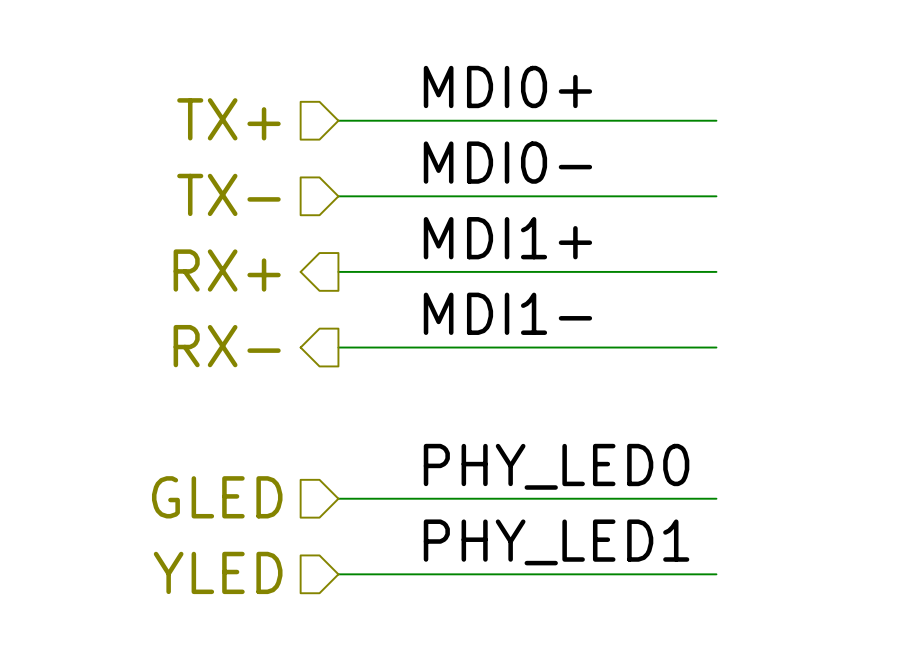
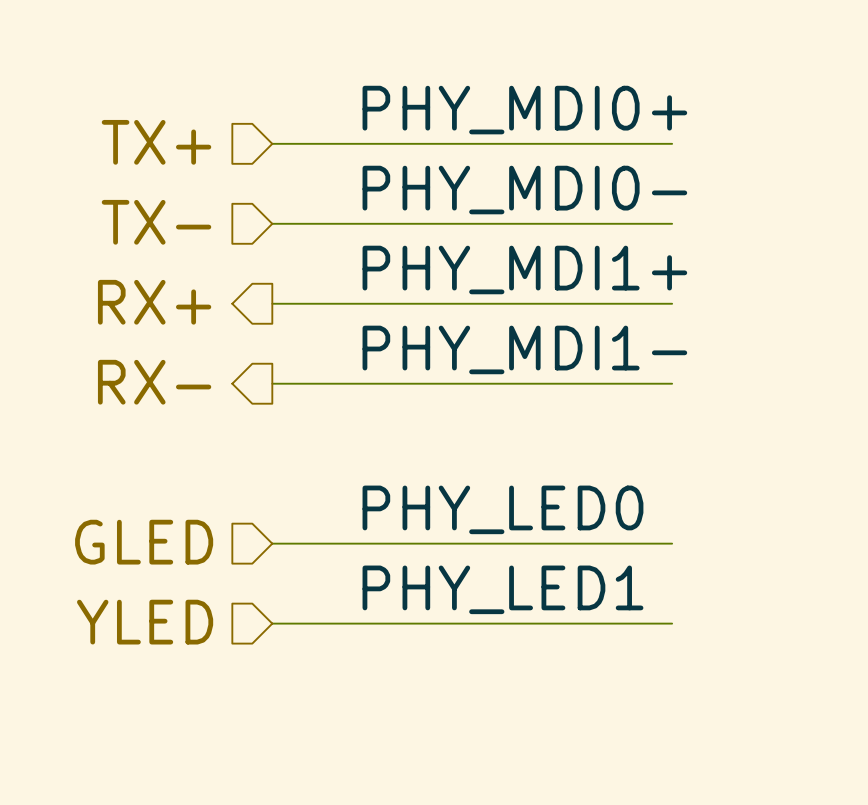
label: MDI0+ (507, 86) -> PHY_MDI0+ (524, 110)
label: MDI0- (507, 162) -> PHY_MDI0- (524, 190)
label: MDI1+ (507, 238) -> PHY_MDI1+ (524, 269)
label: MDI1- (507, 313) -> PHY_MDI1- (524, 349)

